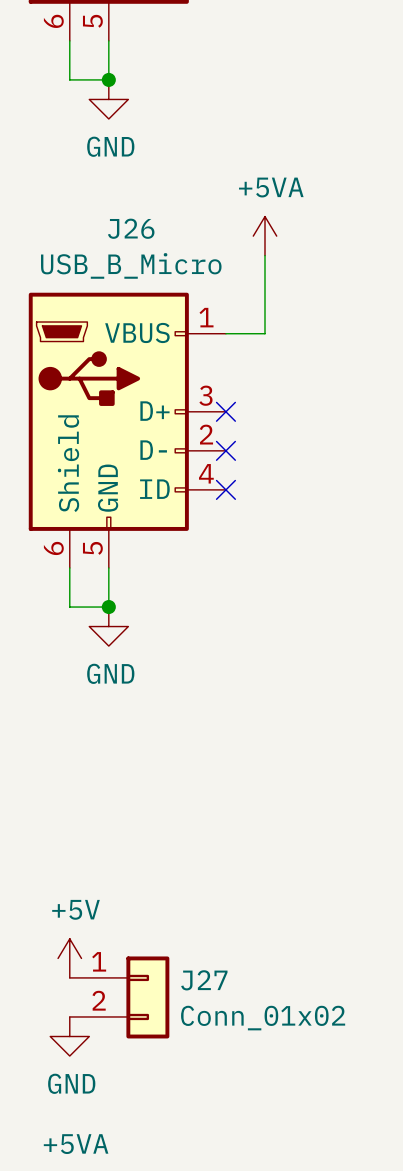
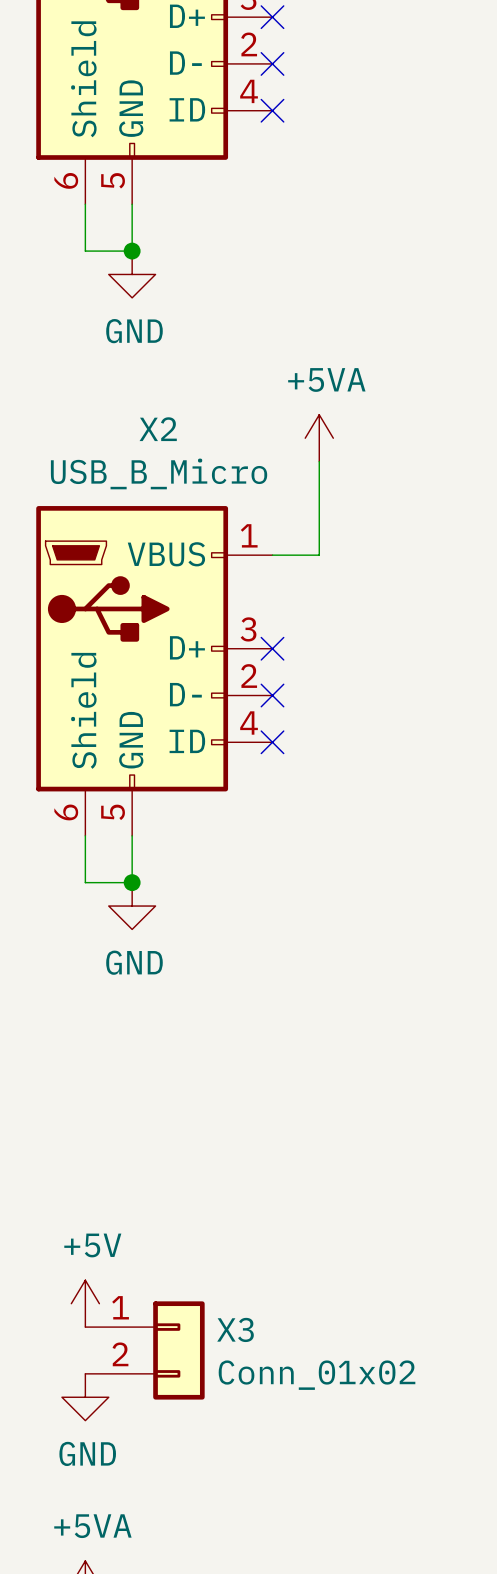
J26 name: J26 (131, 228) -> X2 (158, 429)
J27 name: J27 (204, 980) -> X3 (235, 1329)

